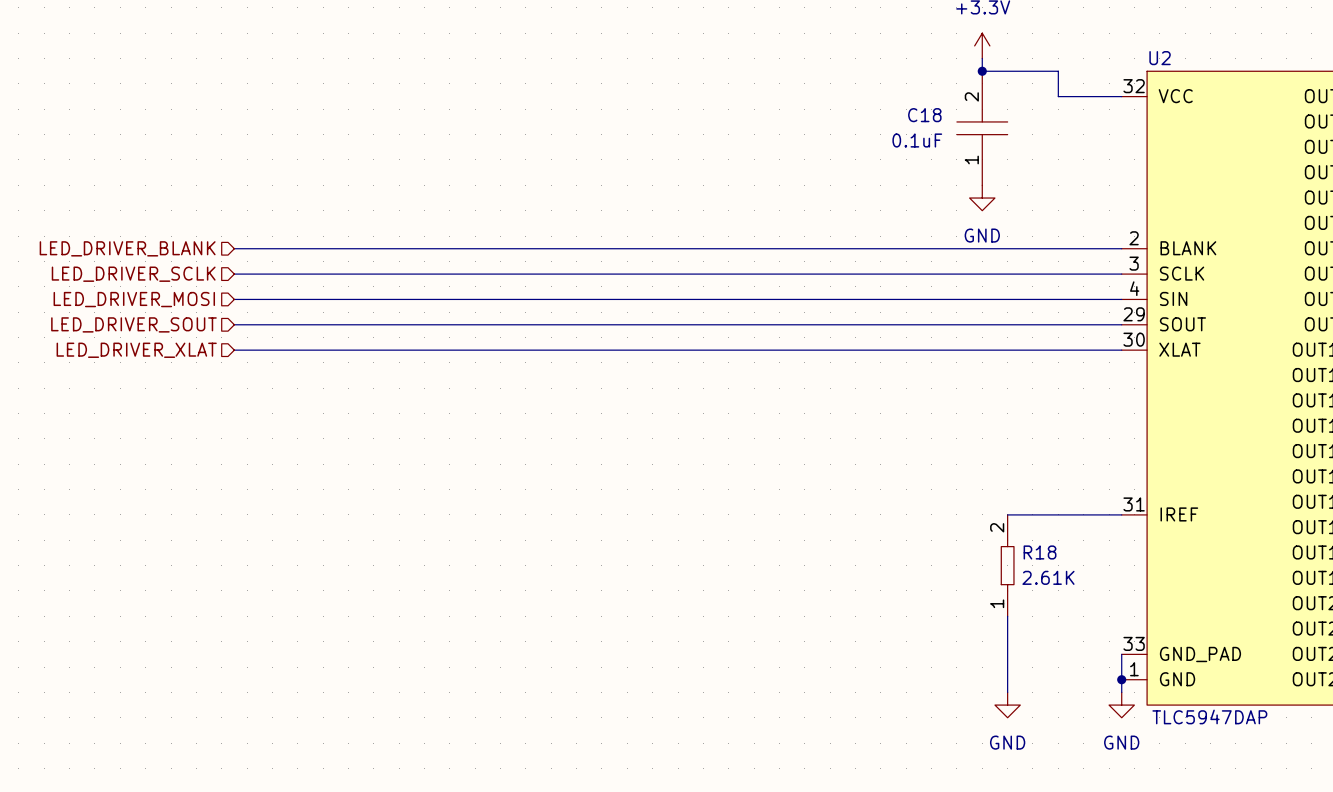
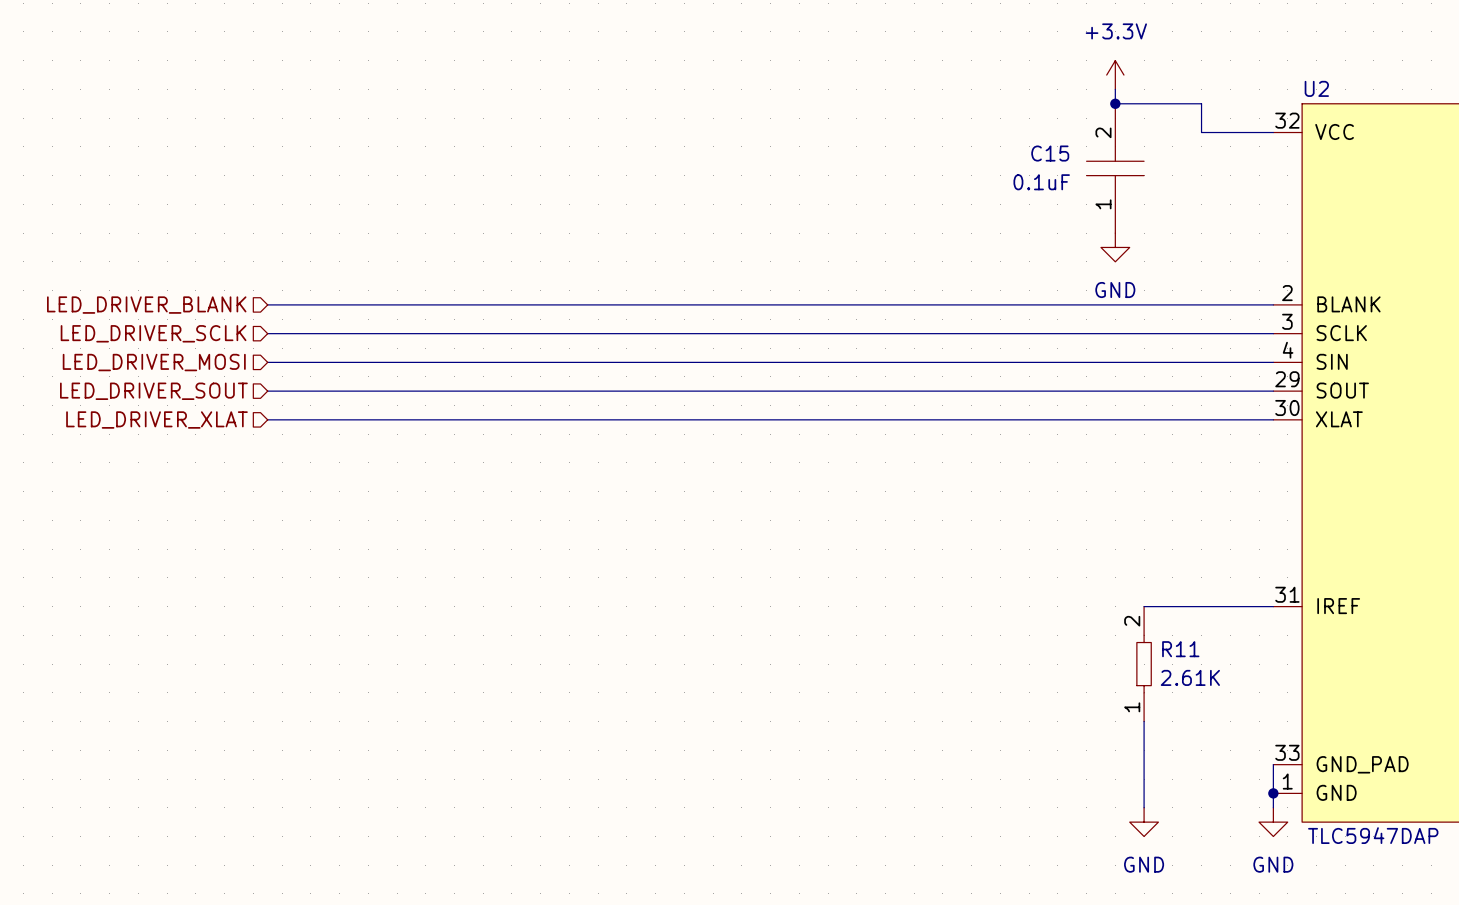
C18 name: C18 (924, 115) -> C15 (1050, 153)
R18 name: R18 (1040, 552) -> R11 (1180, 649)

